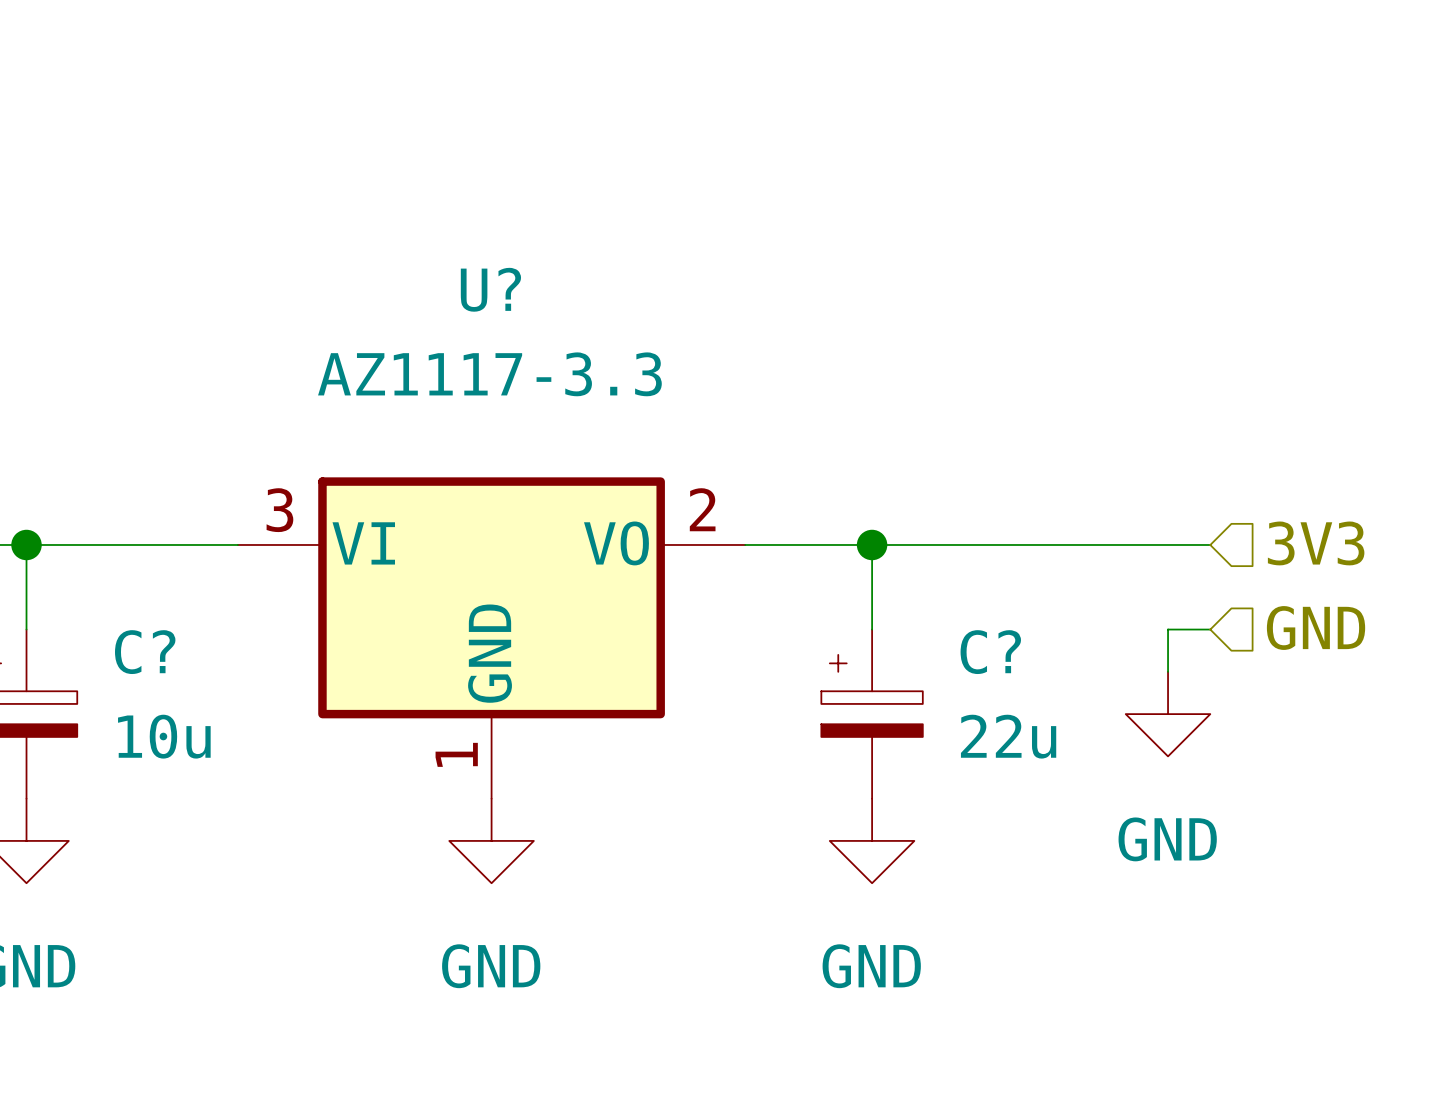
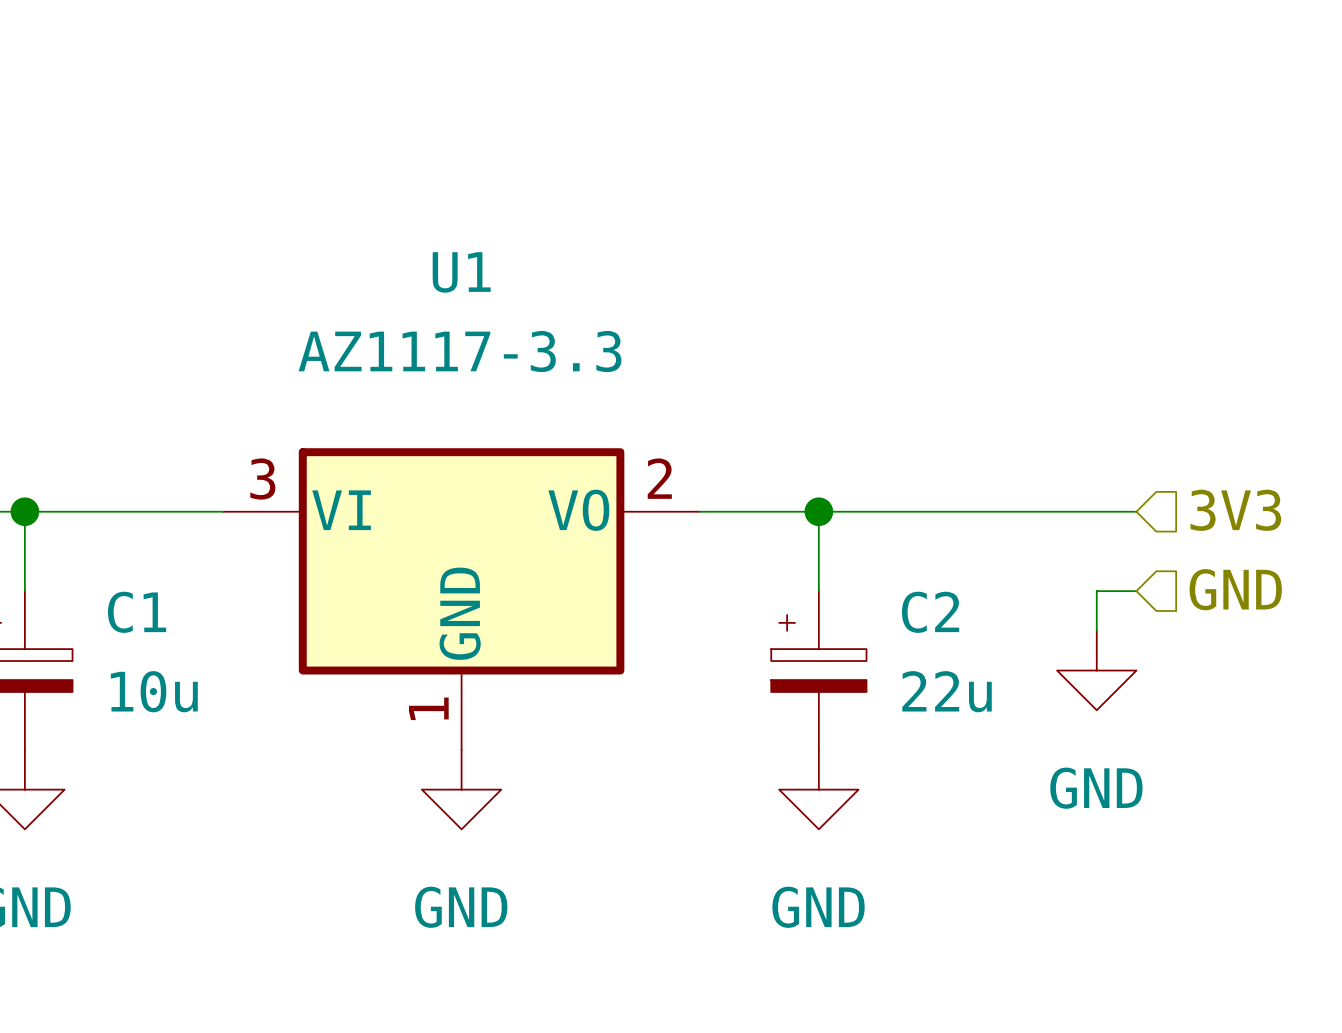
U? name: U? (490, 289) -> U1 (461, 272)
C? name: C? (145, 652) -> C1 (137, 612)
C? name: C? (990, 652) -> C2 (930, 612)

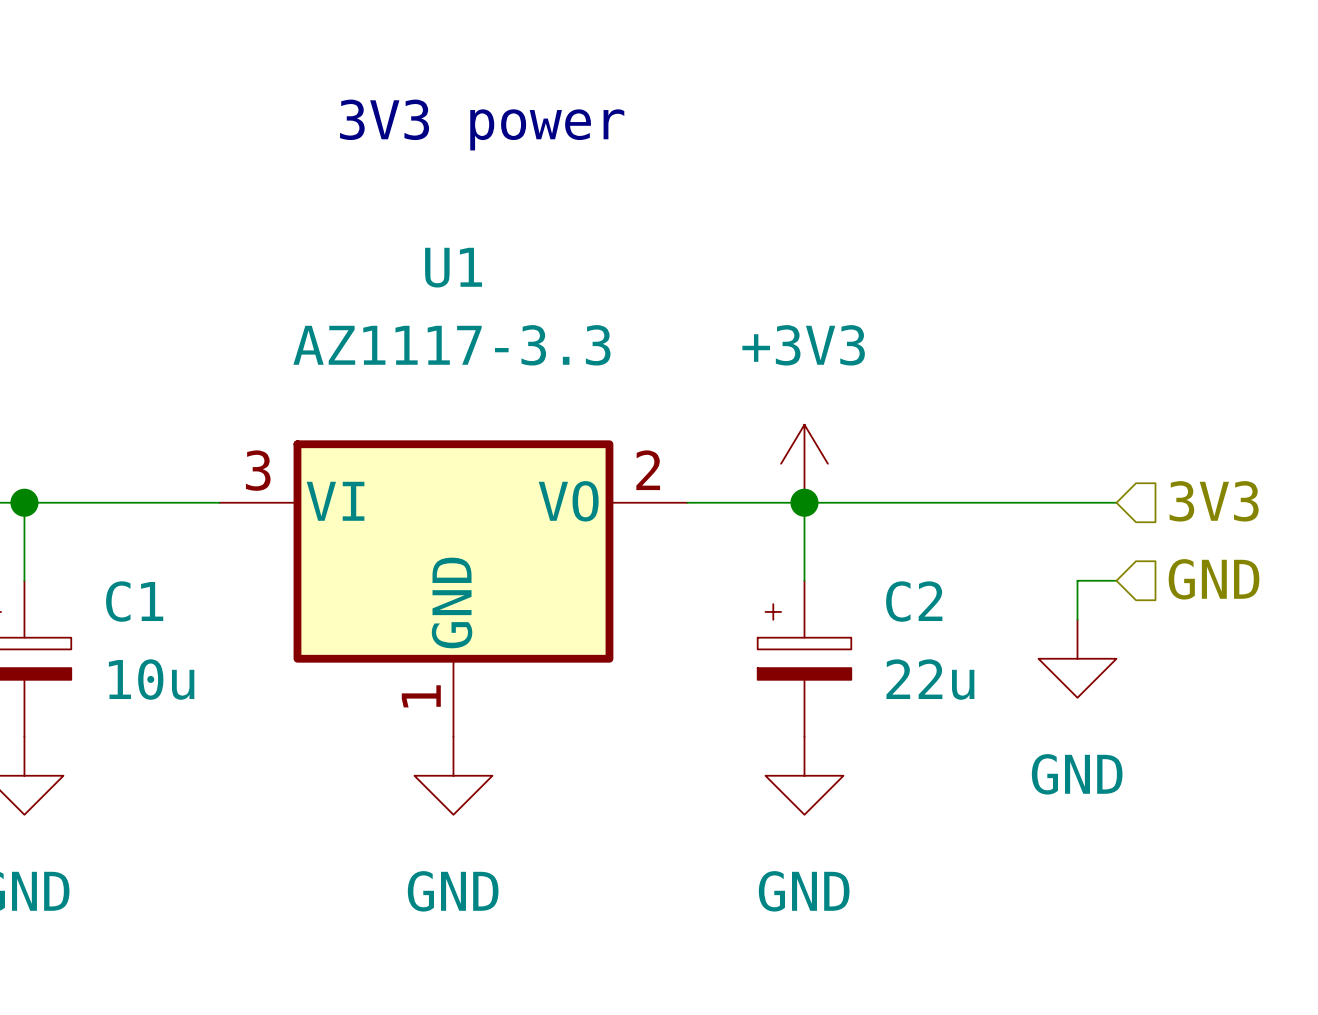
text: none -> 3V3 power (482, 124)
power symbol: none -> +3V3 (804, 463)

